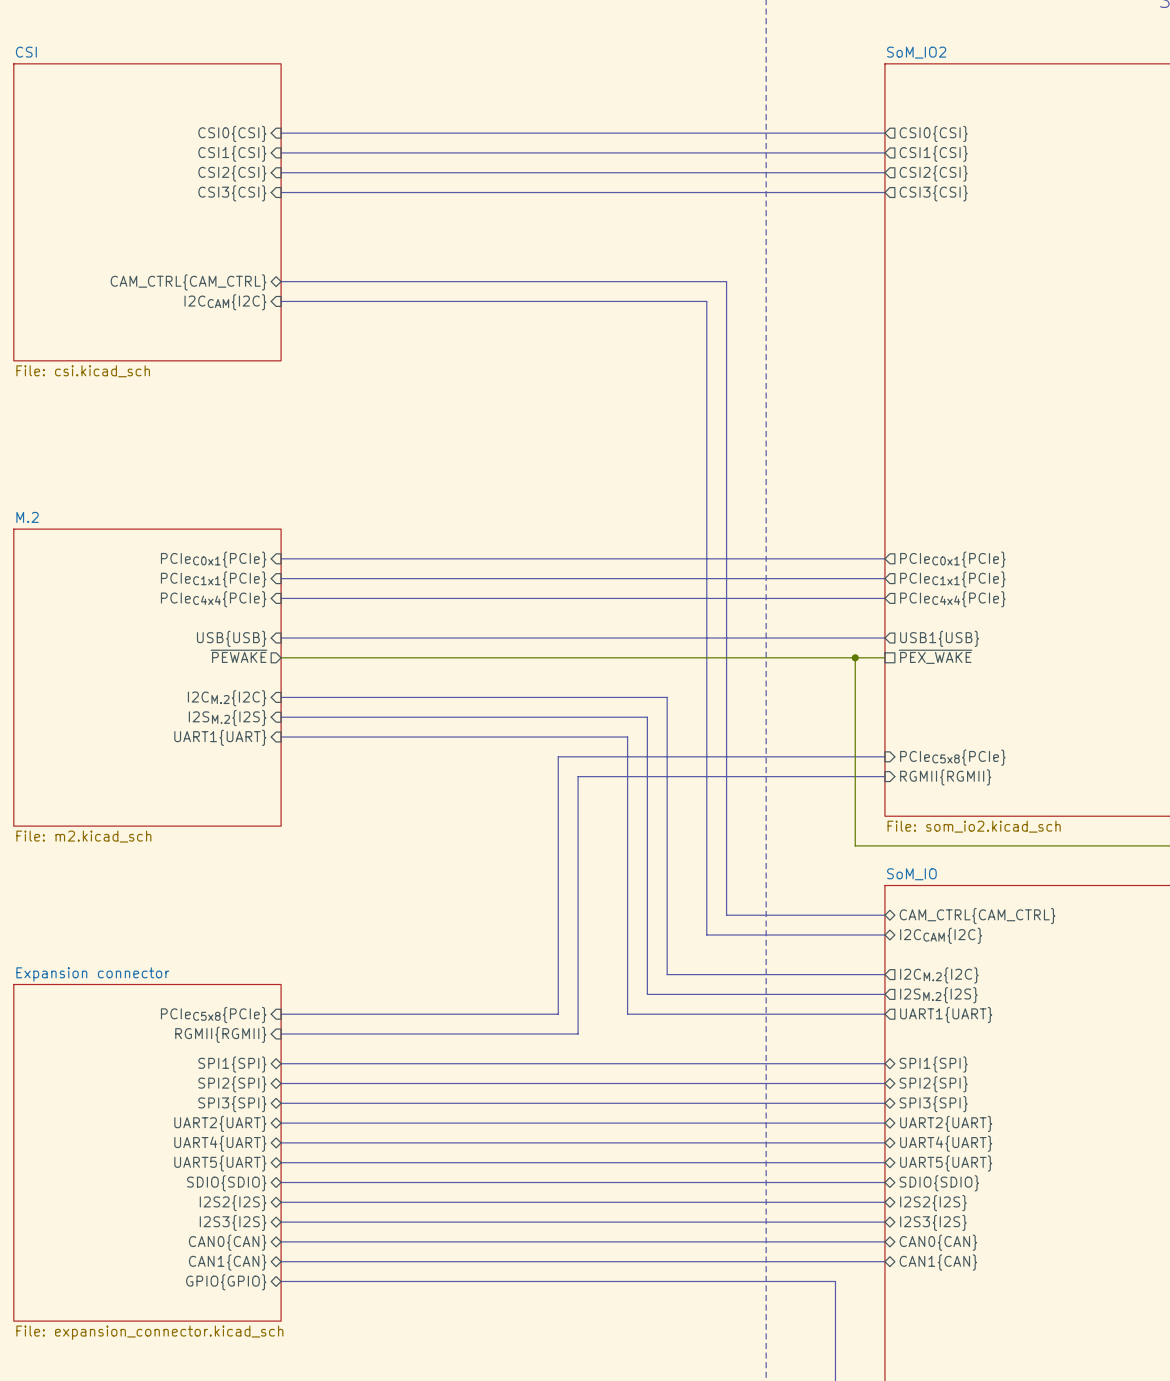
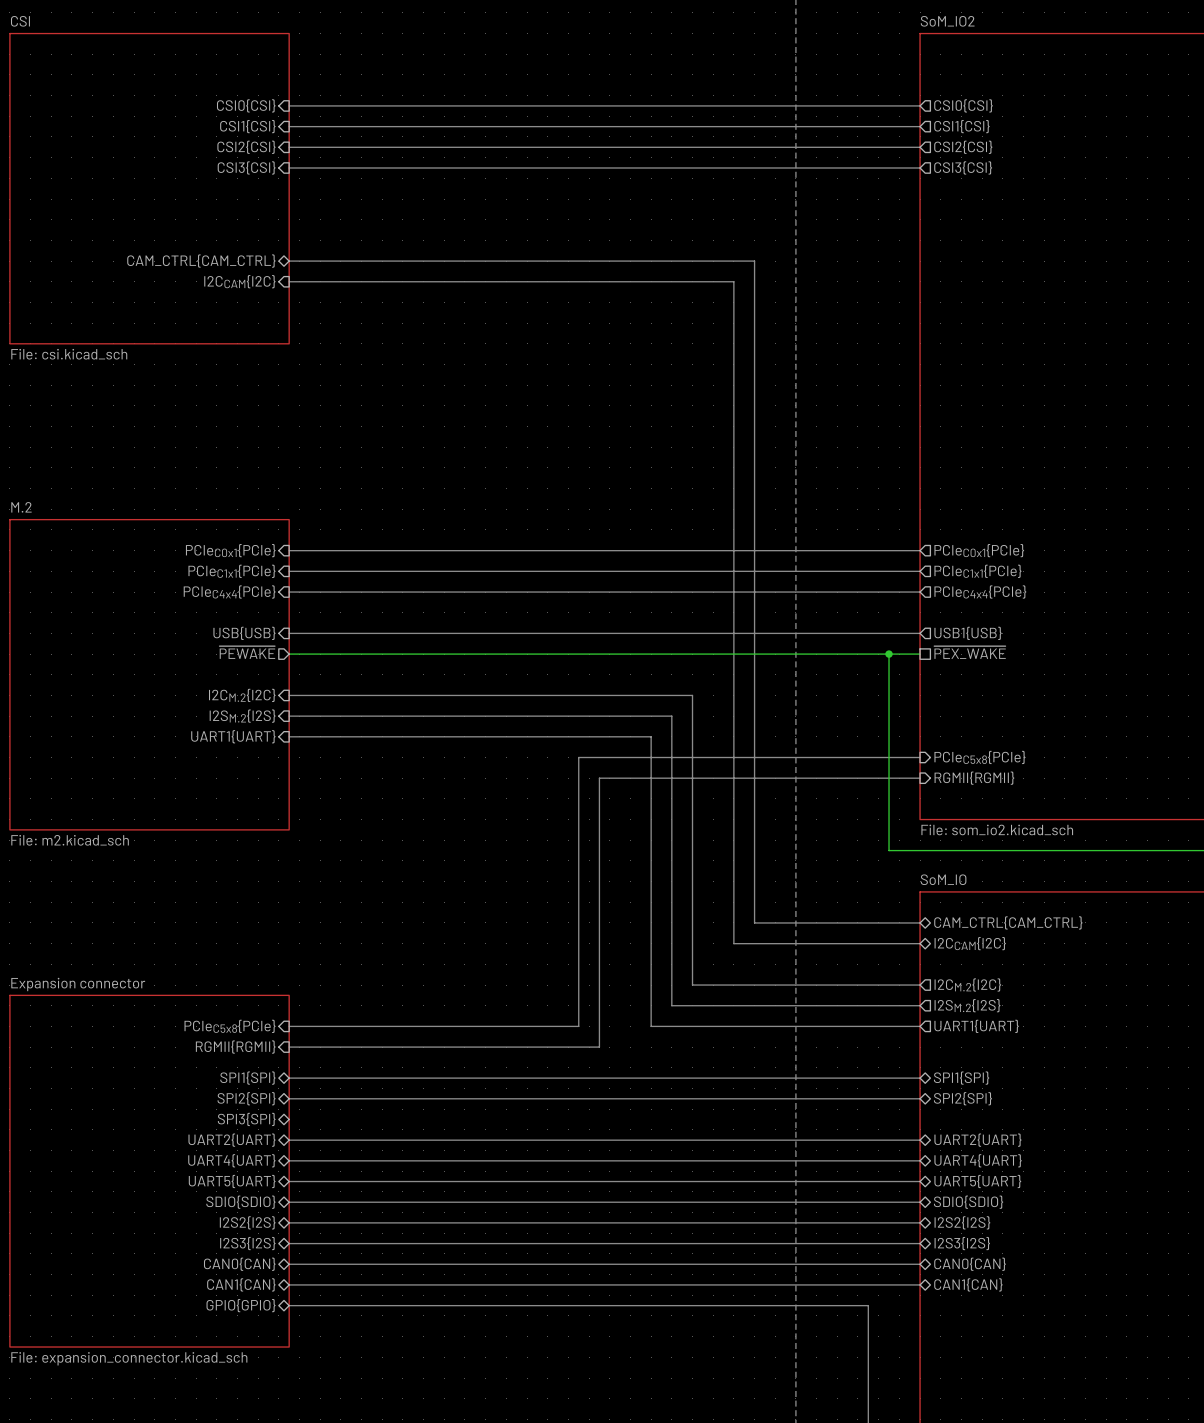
bus: (281, 1103) (884, 1103) -> none
sheet pin: SPI3{SPI} (933, 1104) -> none

